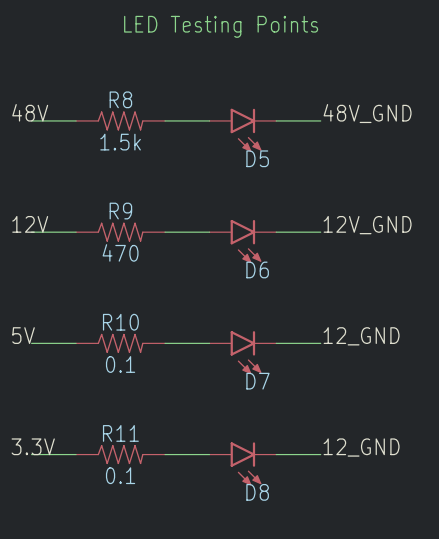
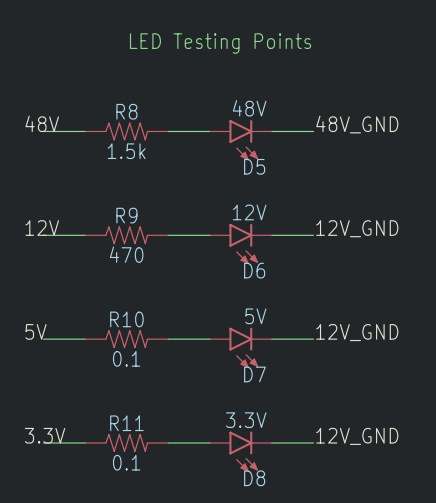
D5 value: none -> 48V (249, 108)
D6 value: none -> 12V (249, 212)
D7 value: none -> 5V (255, 316)
label: 12_GND (361, 336) -> 12V_GND (357, 332)
D8 value: none -> 3.3V (246, 420)
label: 12_GND (361, 447) -> 12V_GND (357, 436)

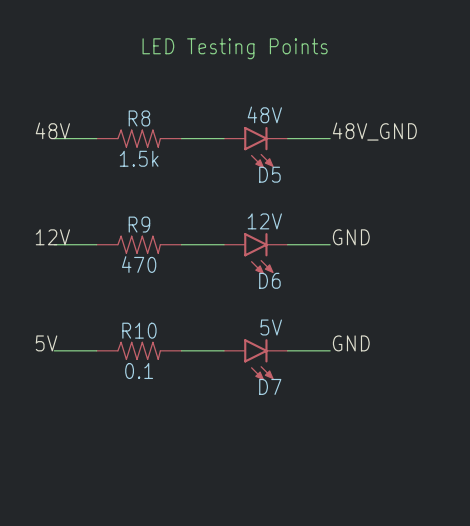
label: 12V_GND (357, 228) -> GND (351, 237)
label: 12V_GND (357, 332) -> GND (351, 343)
label: 3.3V (45, 435) -> none
label: 12V_GND (357, 436) -> none
wire: (43, 442) (85, 442) -> none
R11: 0.1 (126, 442) -> none
wire: (168, 442) (209, 442) -> none
wire: (272, 442) (313, 442) -> none
D8: 3.3V (240, 451) -> none

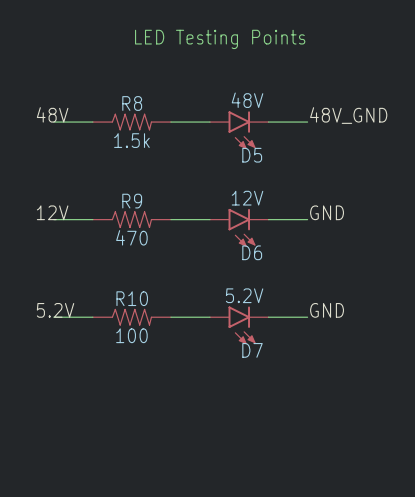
D7 value: 5V (271, 327) -> 5.2V (244, 295)
label: 5V (46, 343) -> 5.2V (55, 310)
R10 value: 0.1 (139, 371) -> 100 (131, 335)

